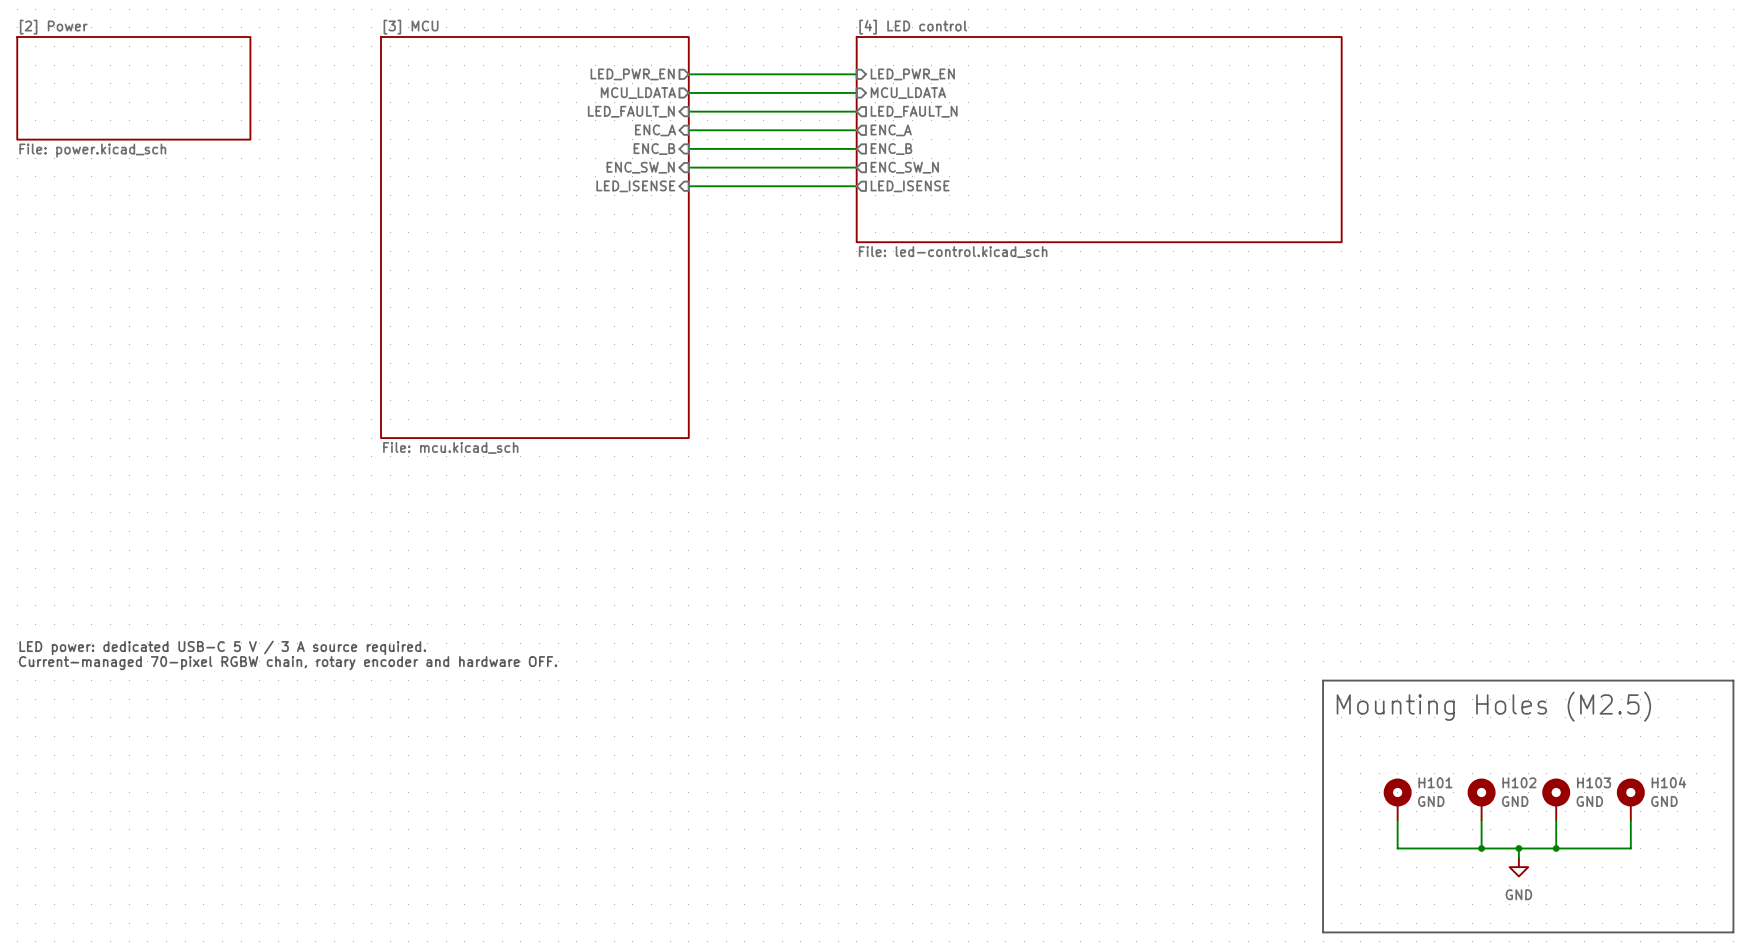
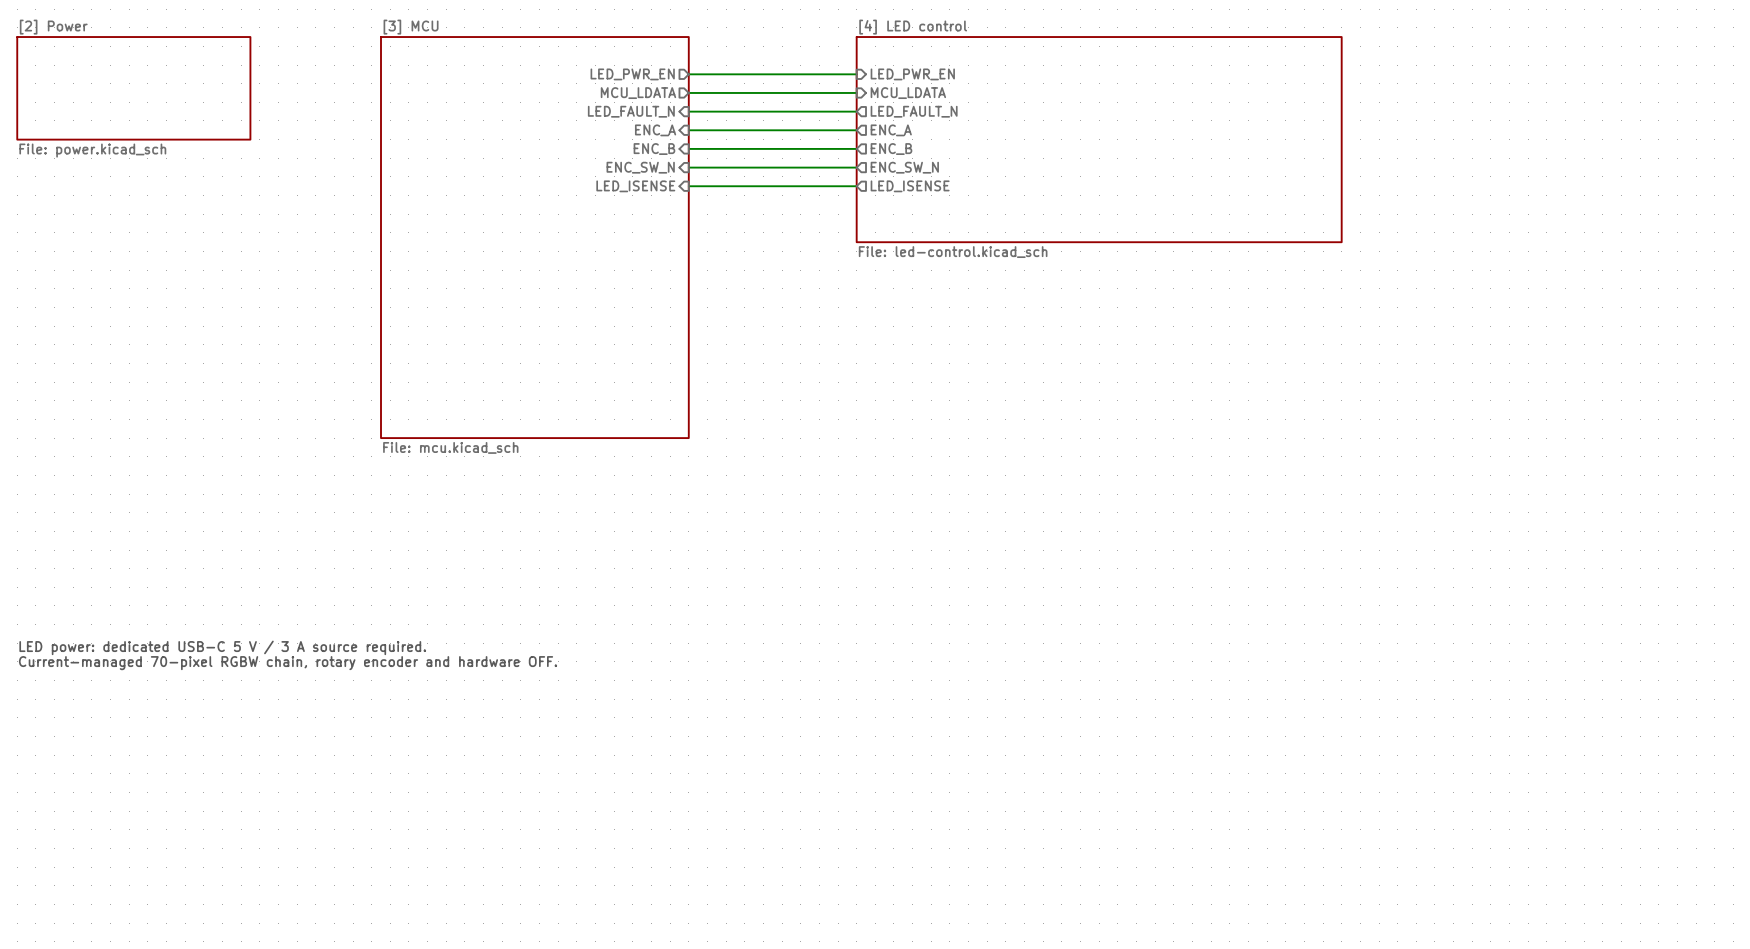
line: (1323, 680) (1323, 932) (1733, 932) (1733, 680) (1323, 680) -> none
text: Mounting Holes (M2.5) (1493, 706) -> none
H101: GND (1397, 799) -> none
H102: GND (1481, 799) -> none
H103: GND (1556, 799) -> none
H104: GND (1630, 799) -> none
wire: (1397, 820) (1397, 848) (1630, 848) (1630, 820) -> none
wire: (1481, 820) (1481, 848) -> none
wire: (1556, 820) (1556, 848) -> none
junction: (1481, 848) -> none
wire: (1518, 848) (1518, 857) -> none
junction: (1518, 848) -> none
junction: (1556, 848) -> none
power symbol: GND (1518, 867) -> none

